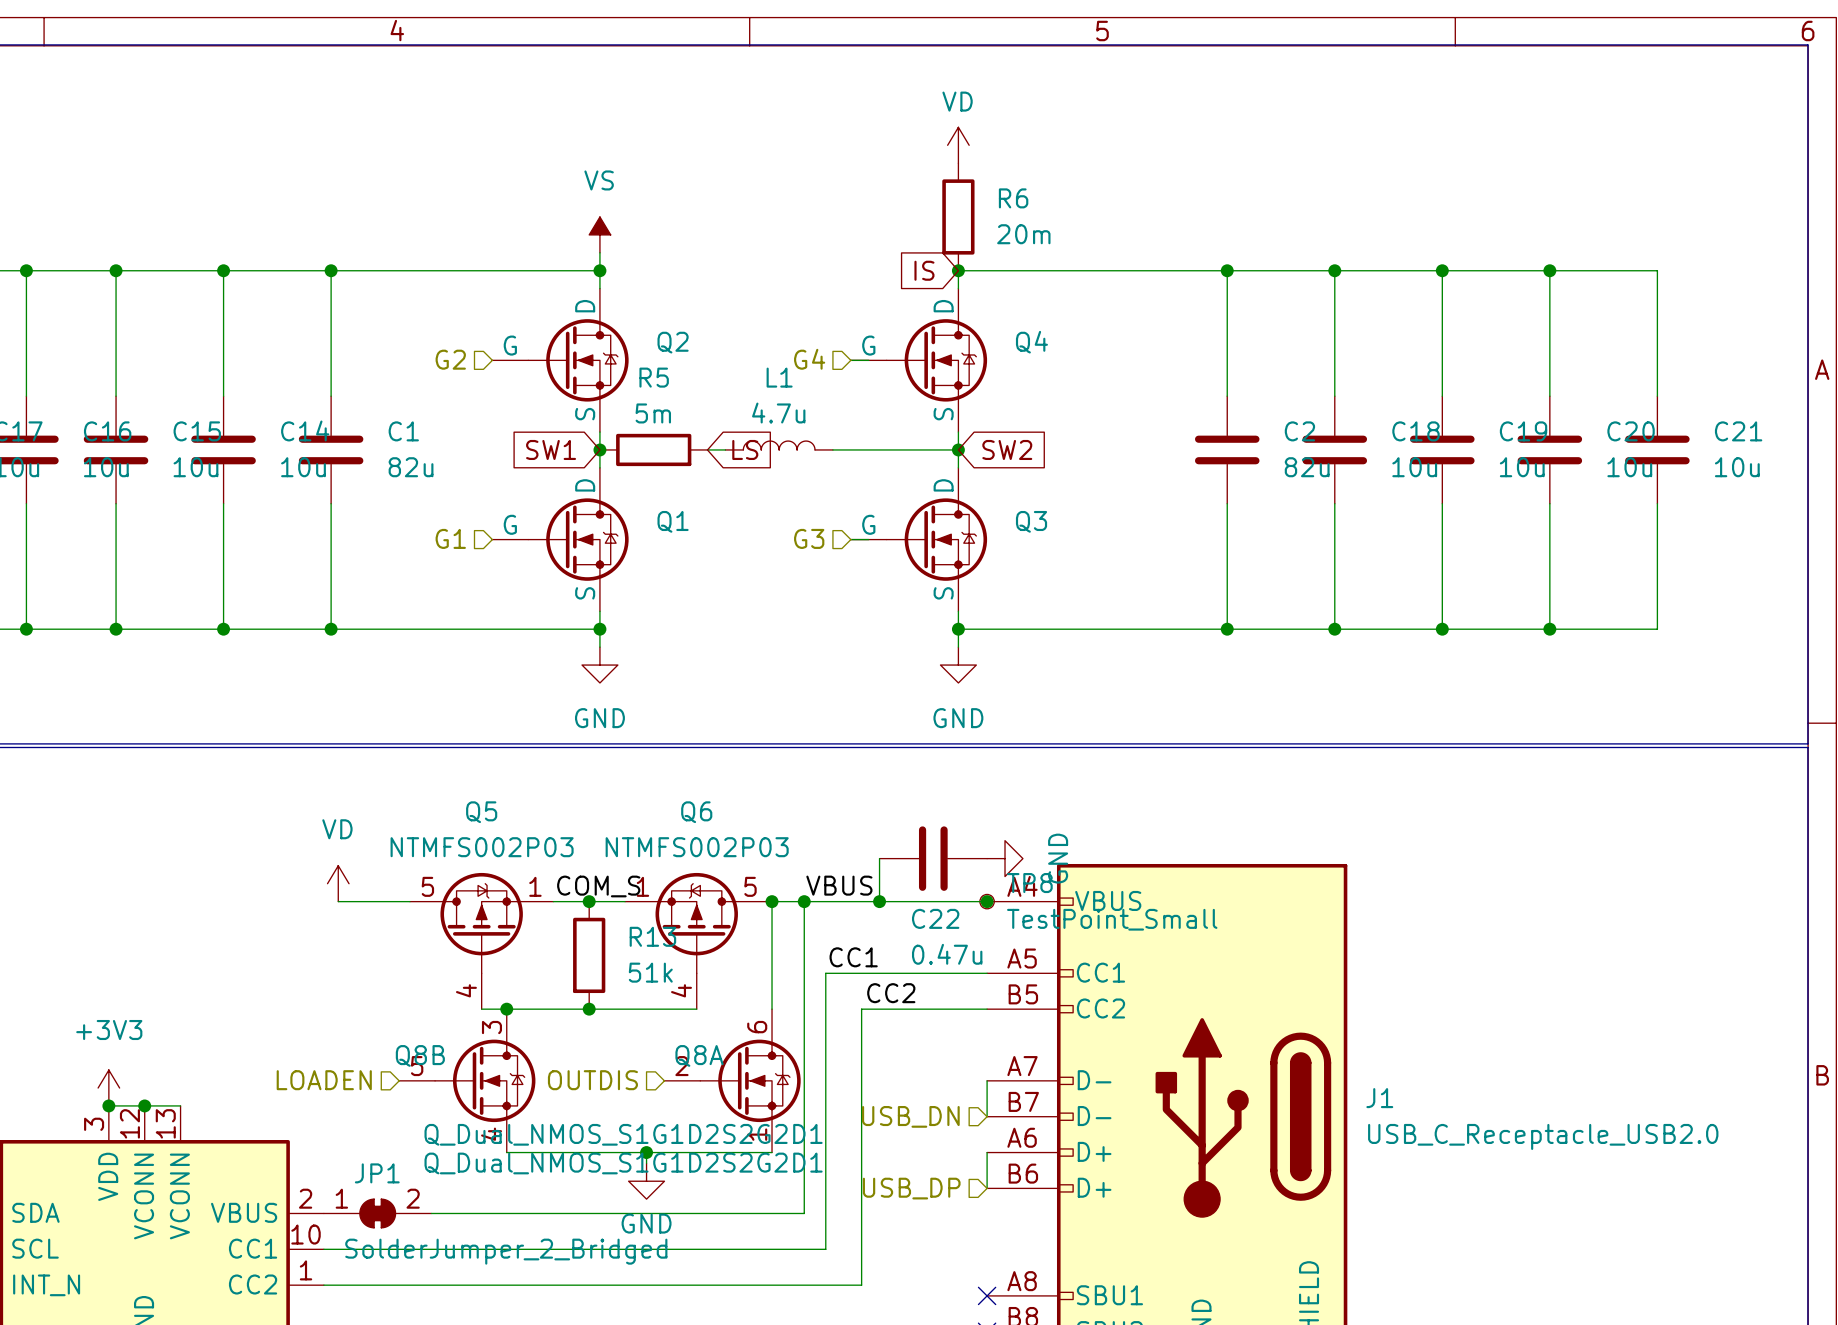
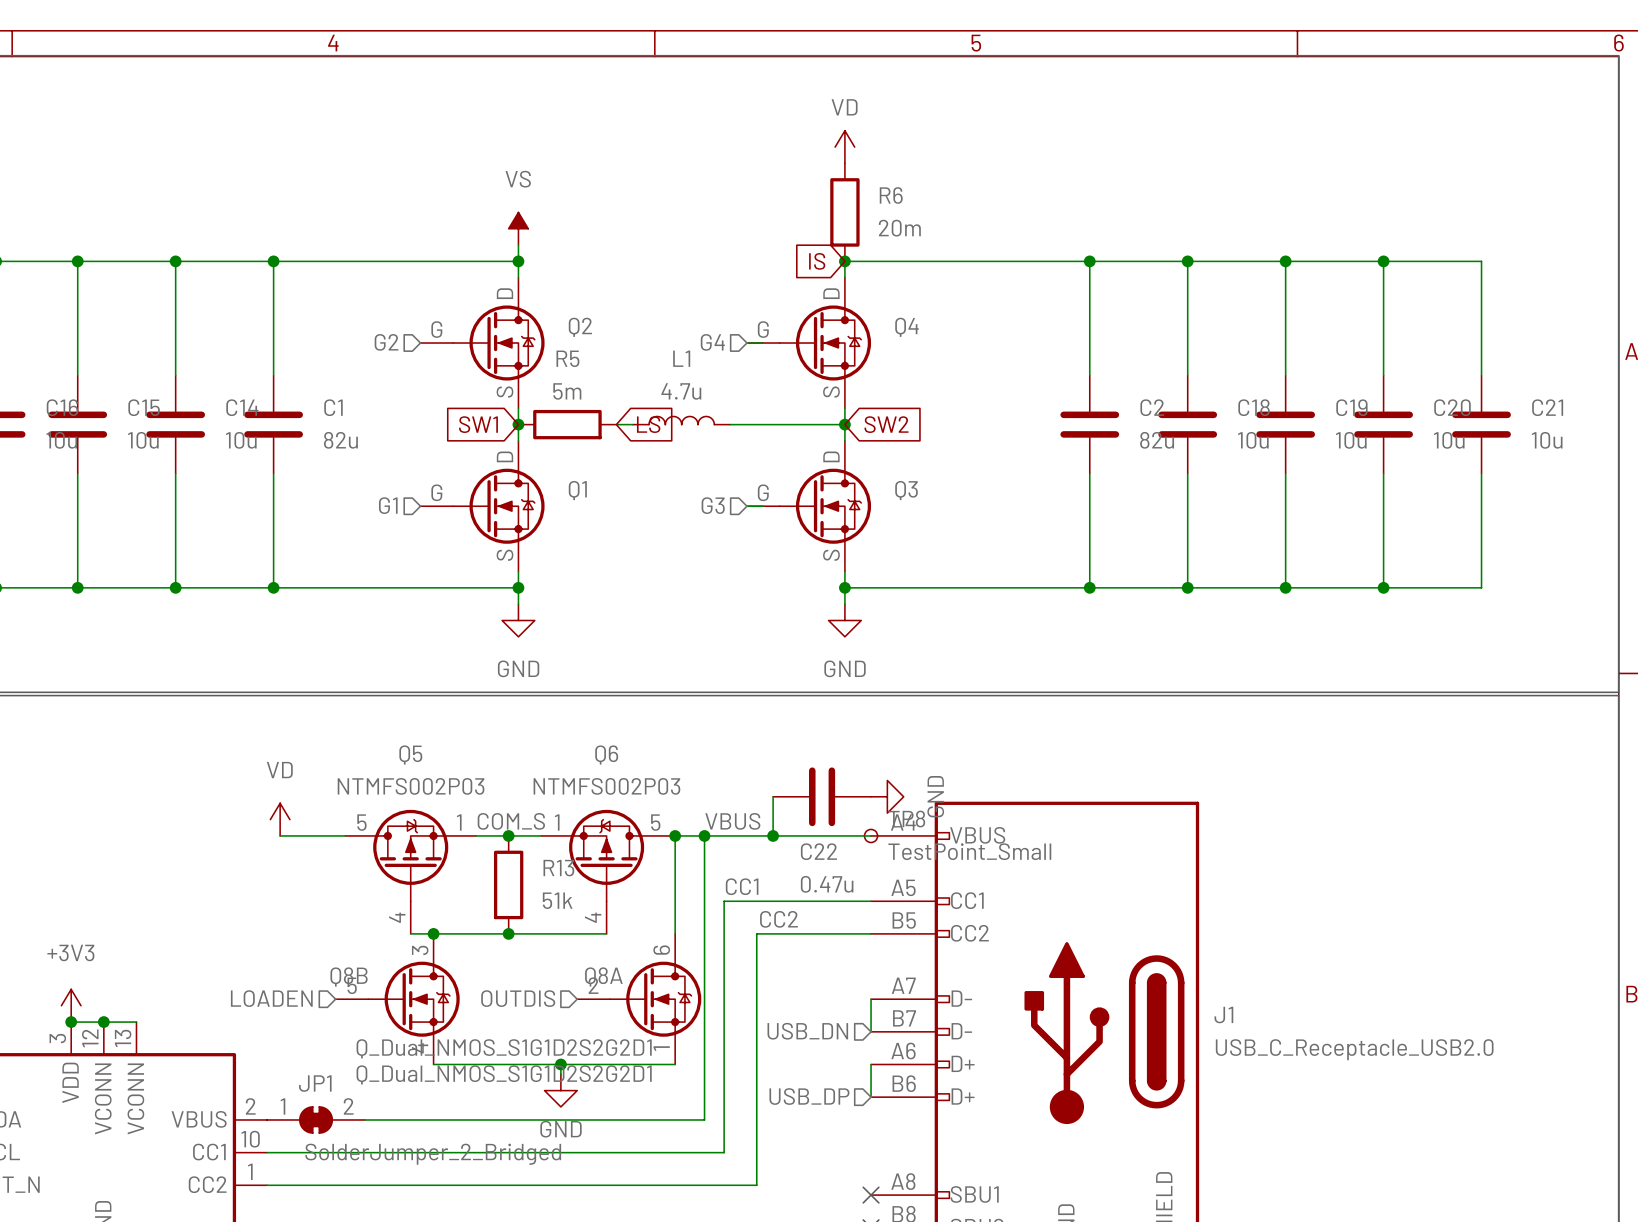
junction: (987, 901) -> none

